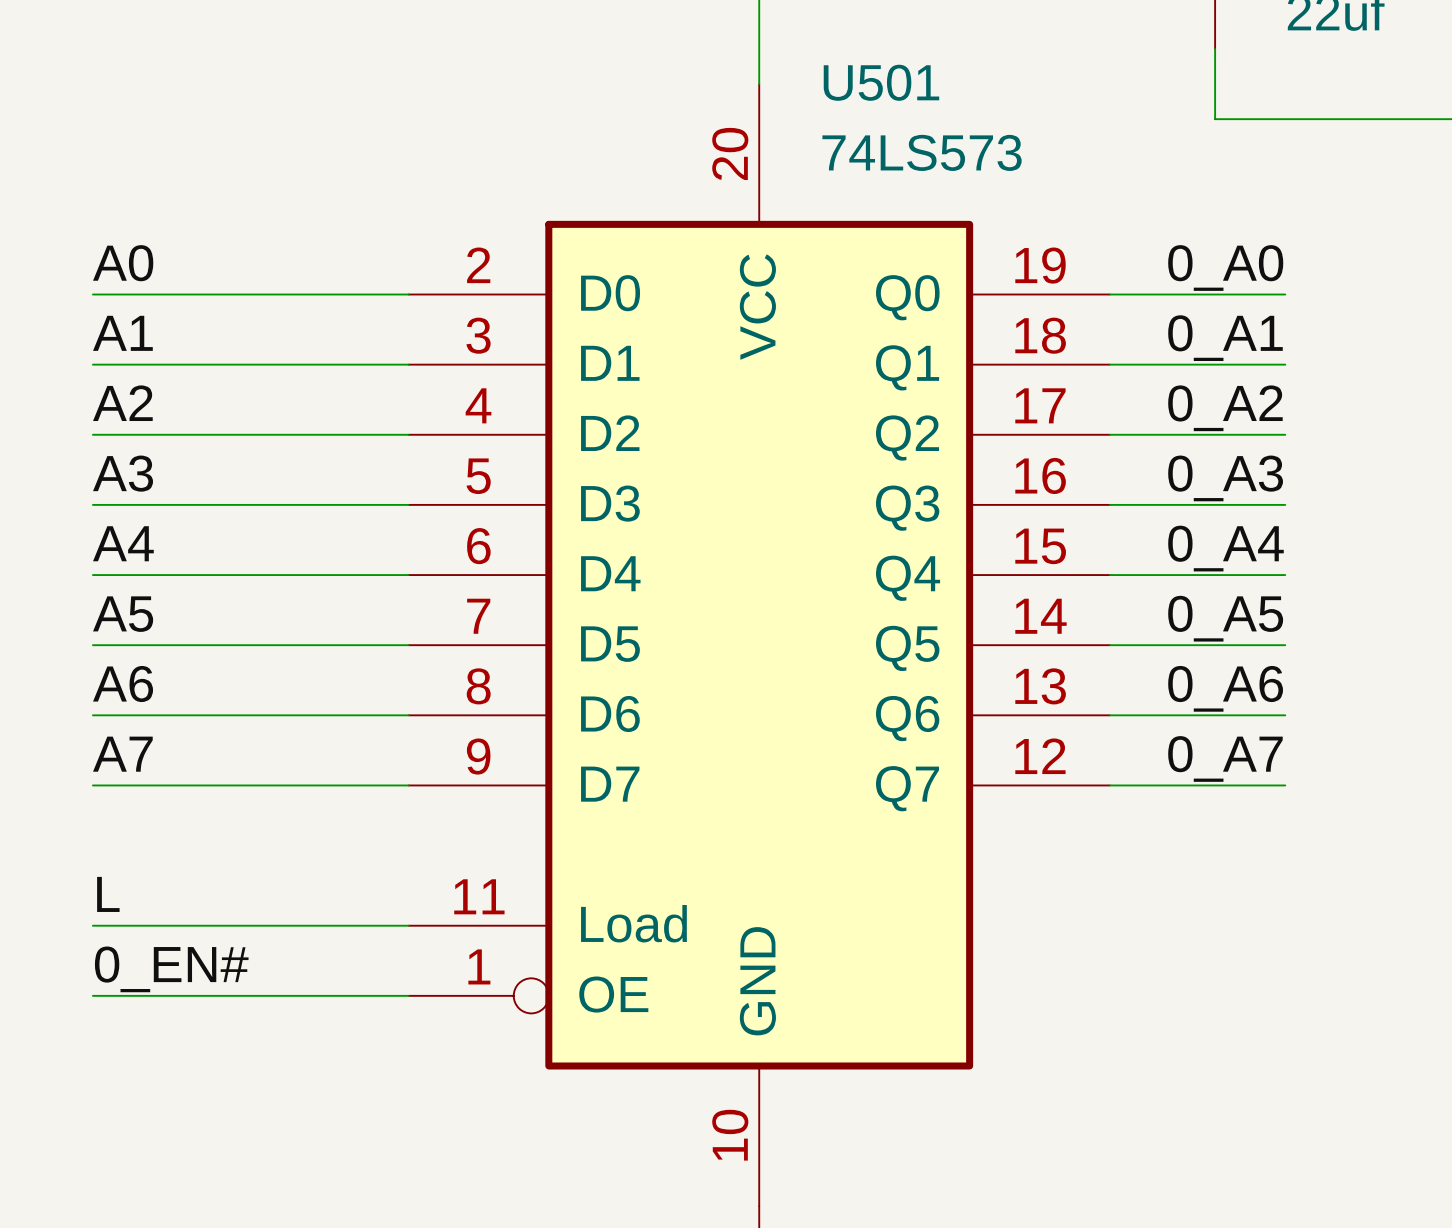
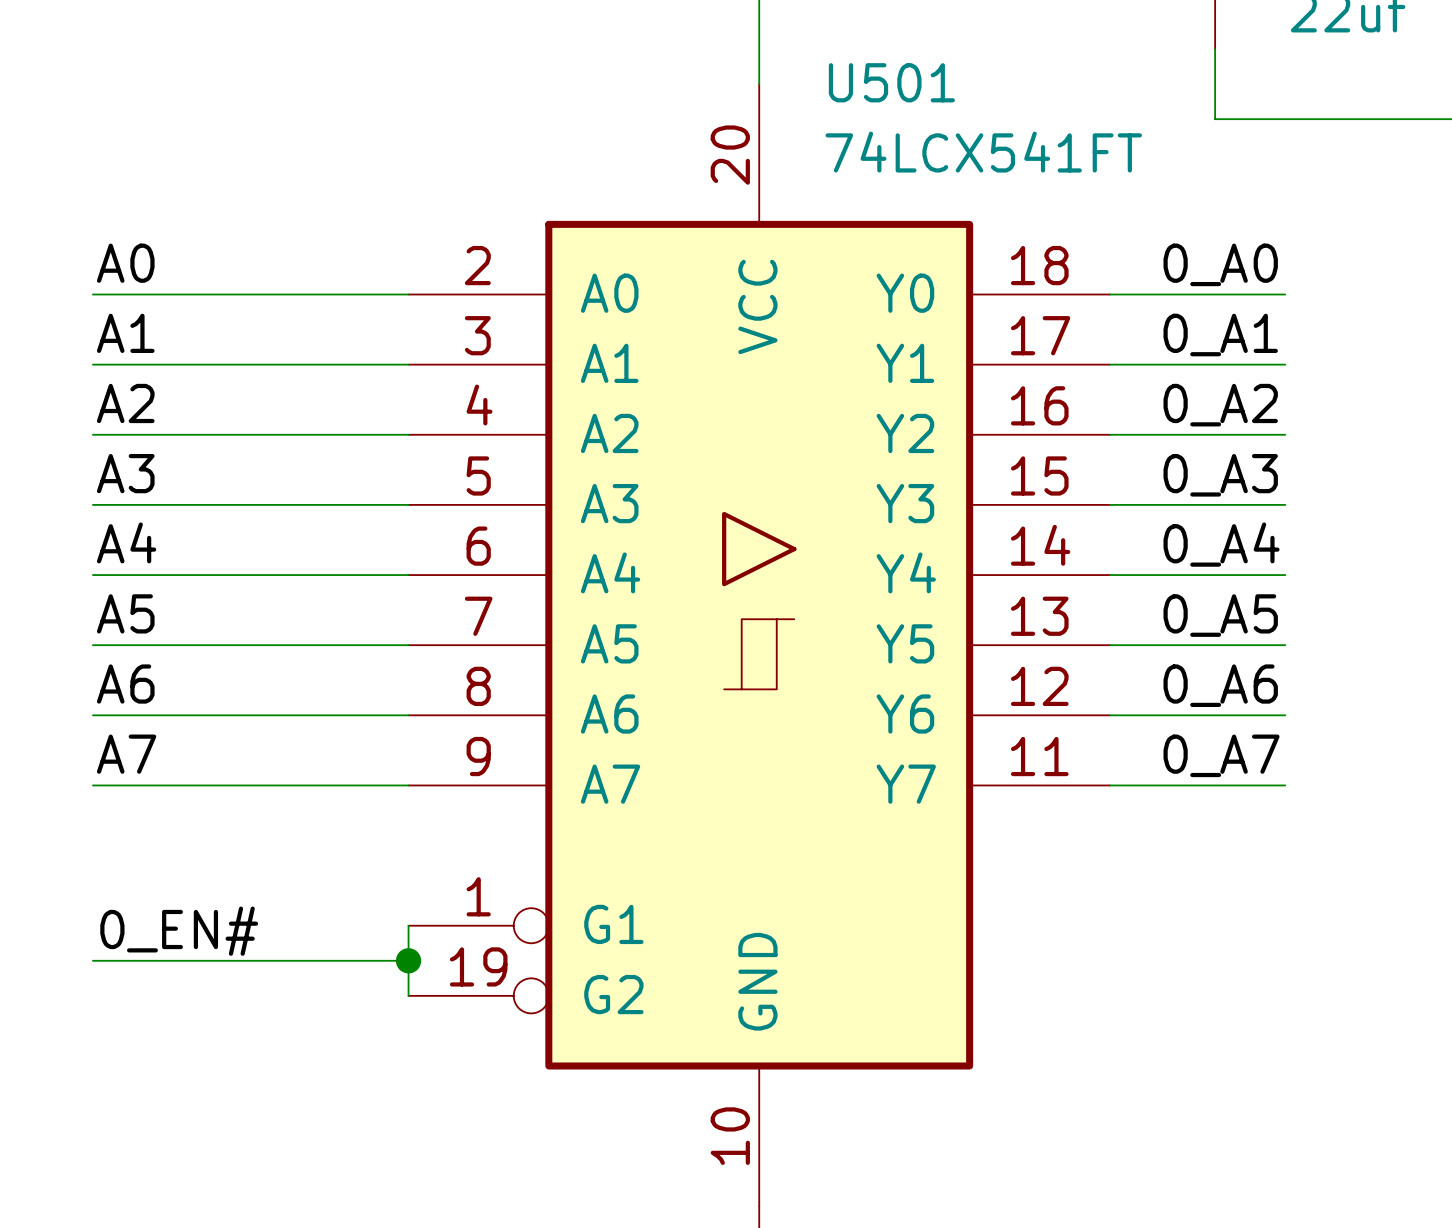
U501 symbol: [408, 84, 1110, 1207] -> [408, 84, 1110, 1207]
U501 value: 74LS573 (922, 152) -> 74LCX541FT (983, 152)
label: L (108, 894) -> none
wire: (92, 925) (408, 925) -> (408, 995) (408, 925)
junction: none -> (408, 960)
label position: 0_EN# (171, 969) -> 0_EN# (179, 931)
wire: (92, 995) (408, 995) -> (92, 960) (408, 960)

